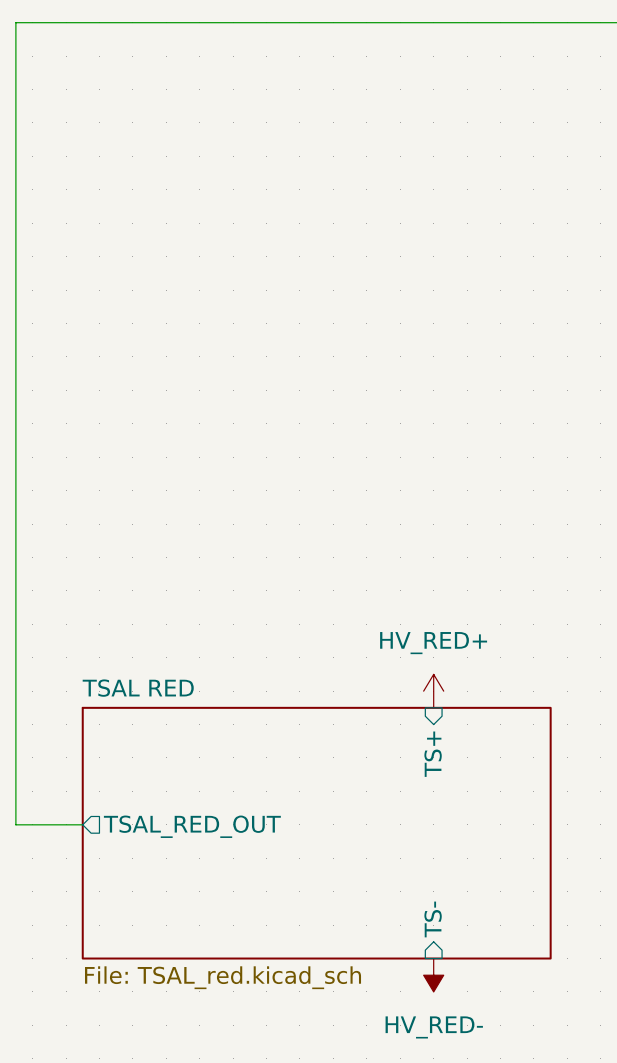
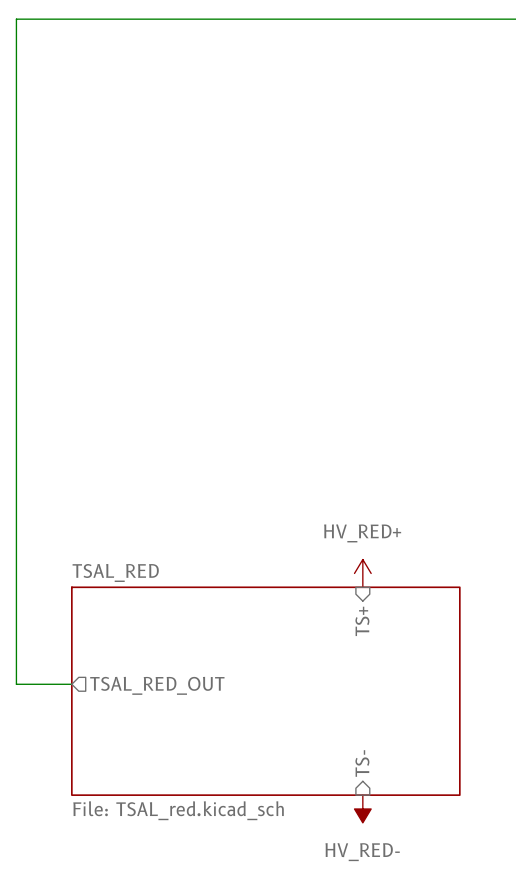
sheet TSAL RED name: TSAL RED (138, 688) -> TSAL_RED (115, 572)

